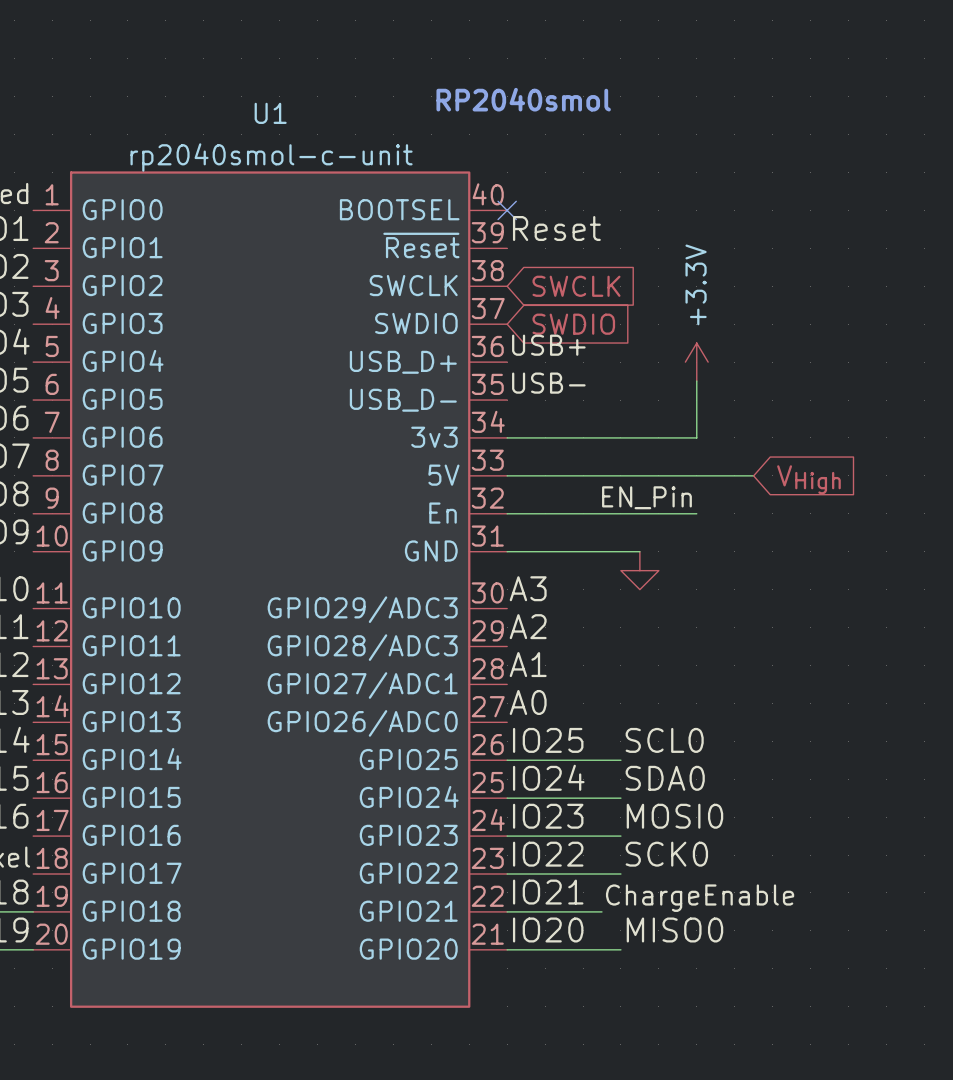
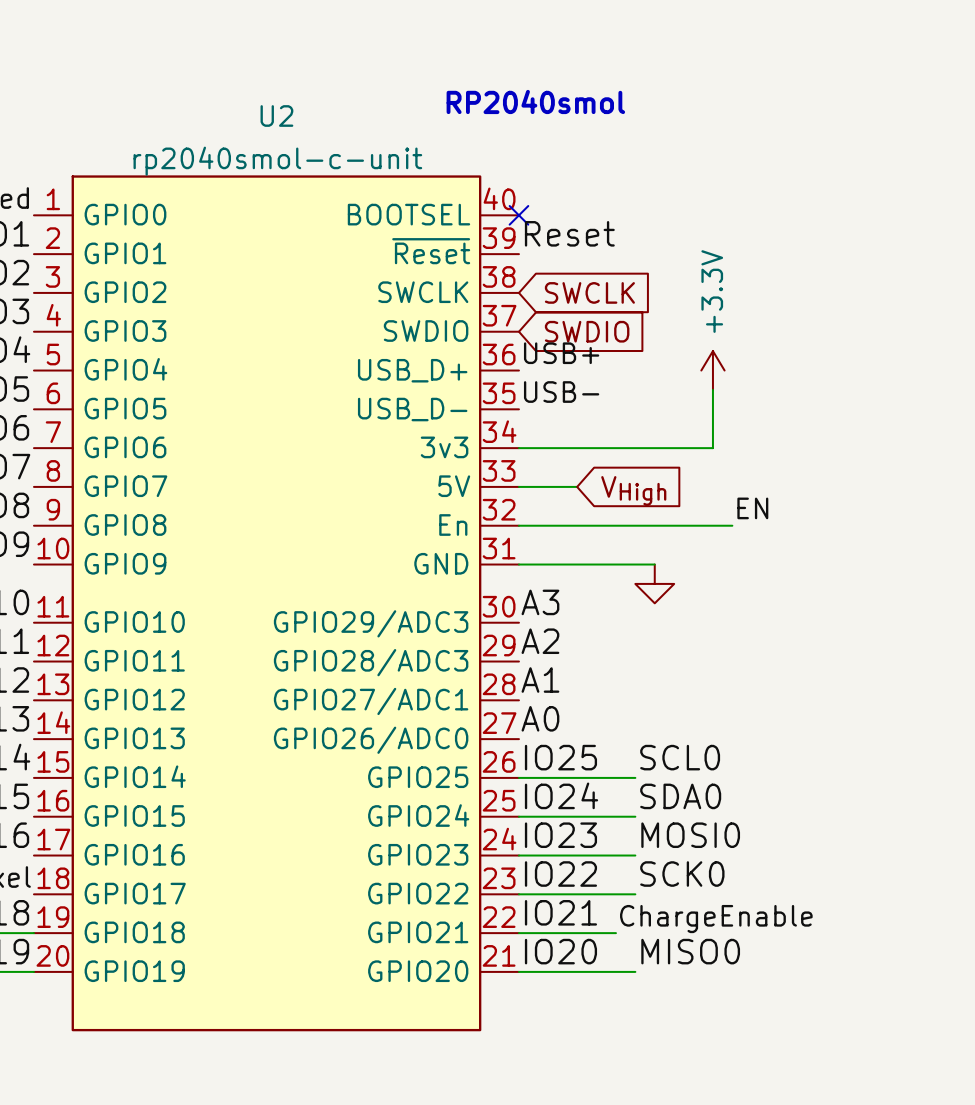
U1 name: U1 (270, 113) -> U2 (276, 115)
wire: (564, 475) (753, 475) -> none
global label position: VHigh (808, 479) -> VHigh (633, 490)
label: none -> EN (752, 508)
label: EN_Pin (646, 497) -> none
wire: none -> (712, 525) (732, 525)

